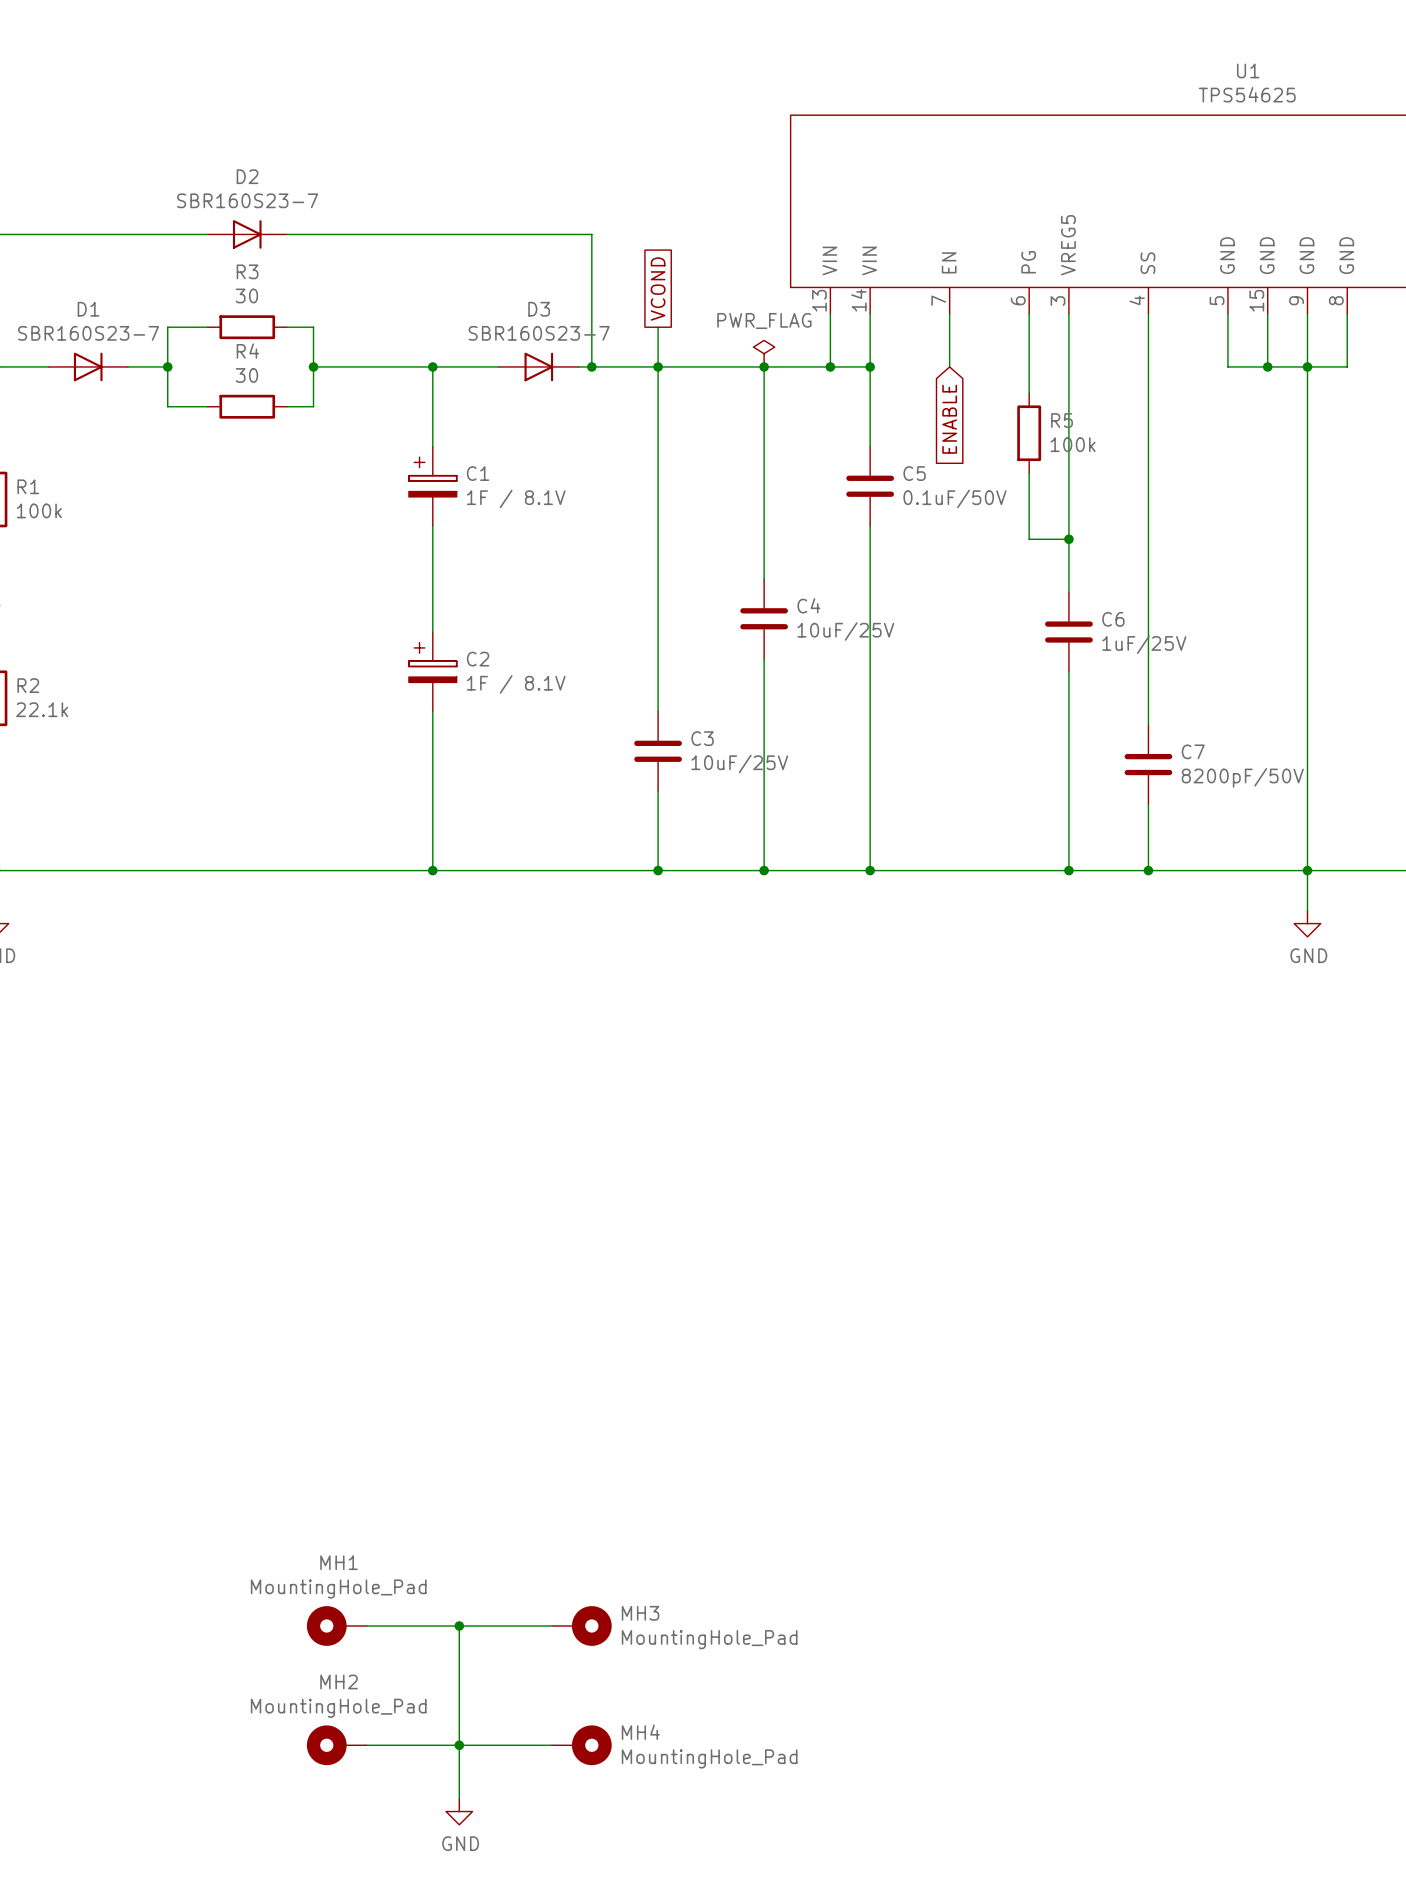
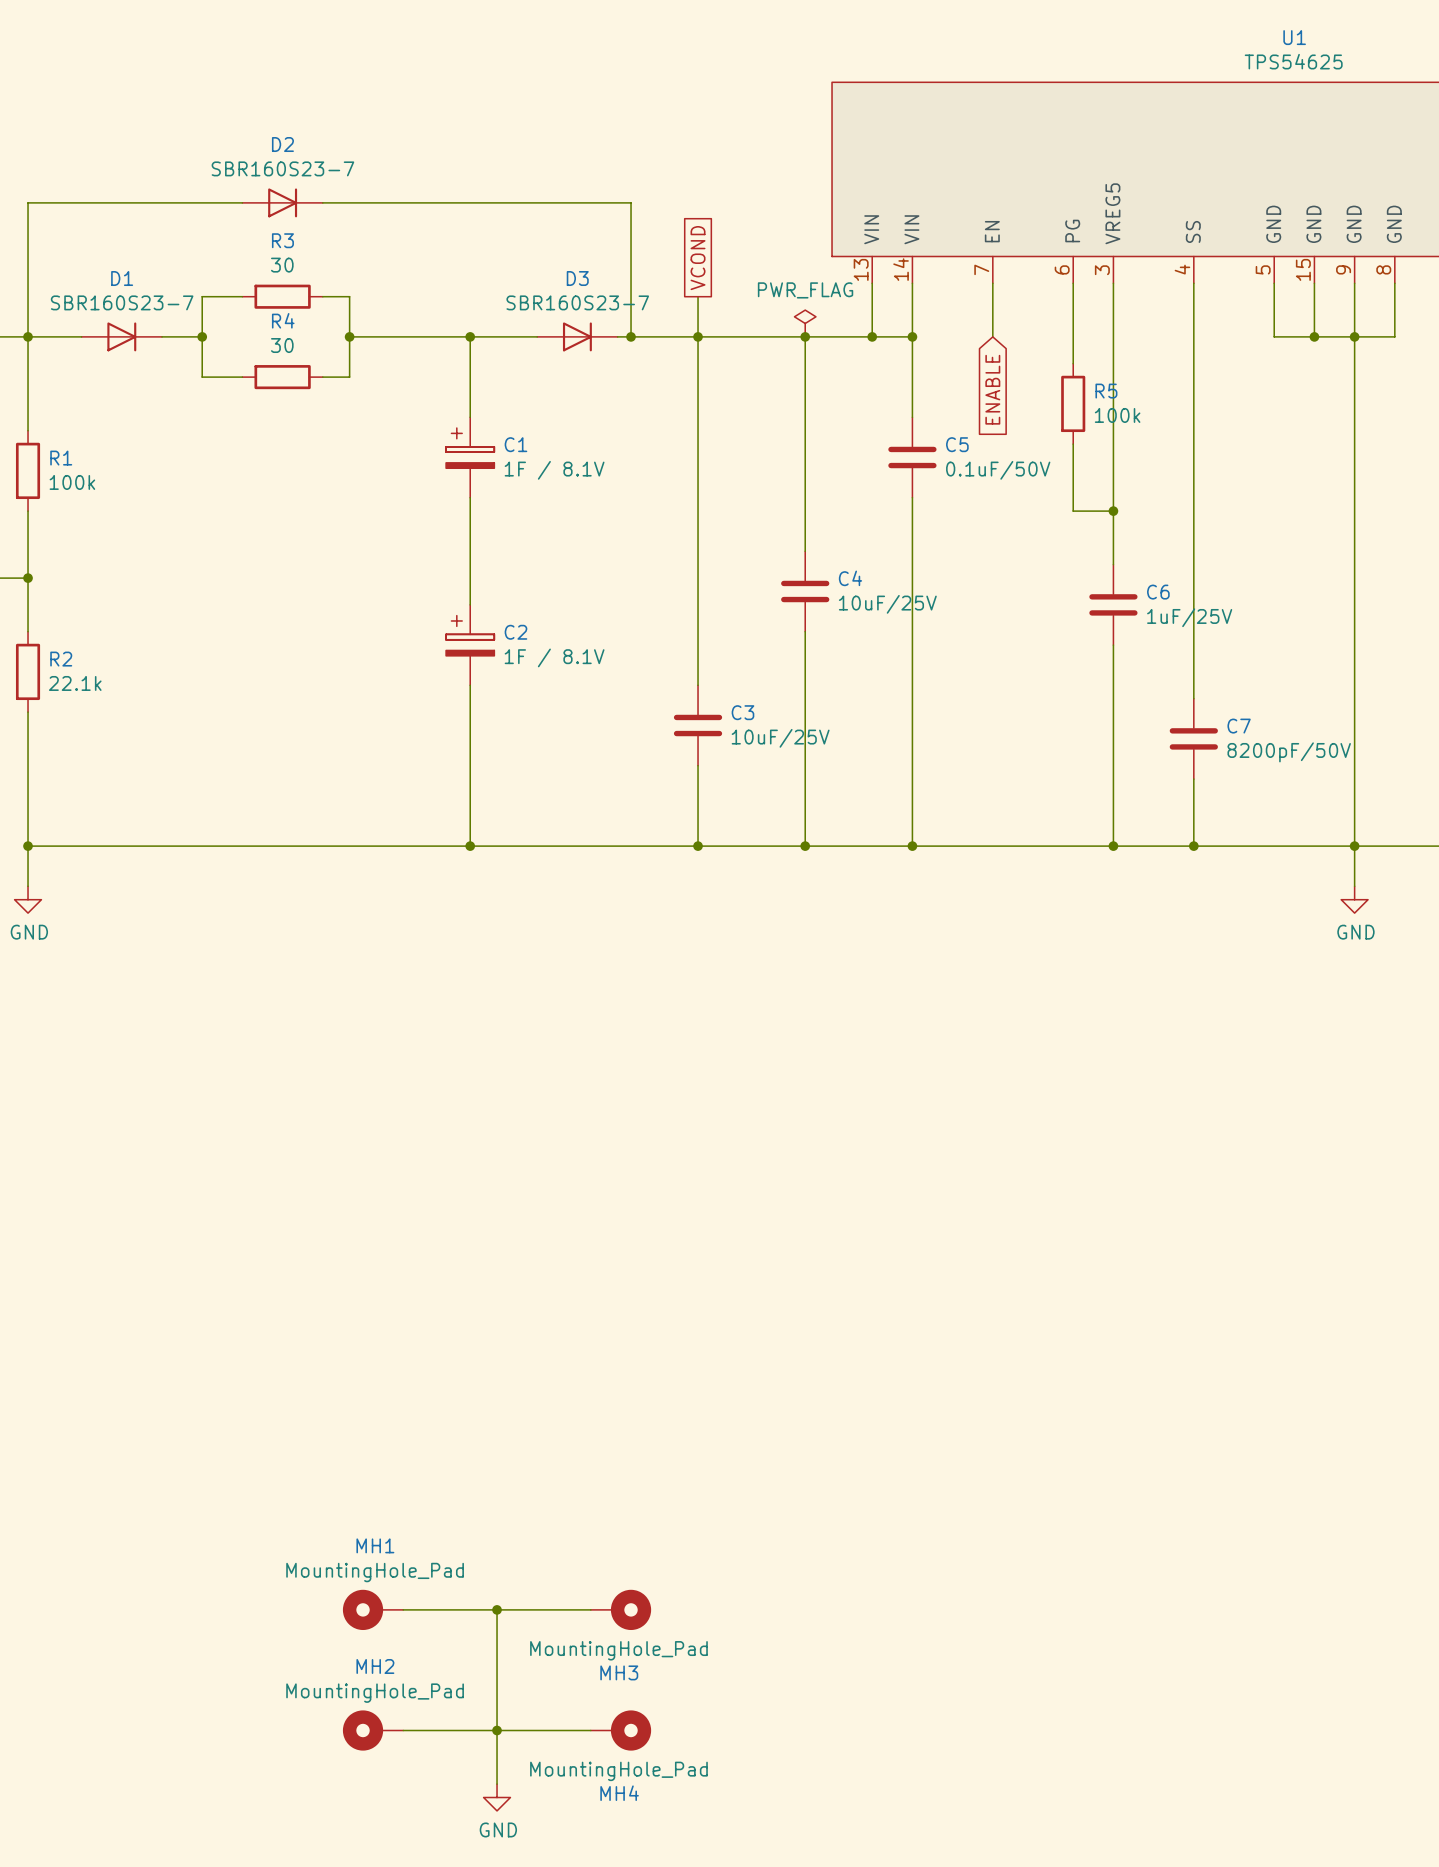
MH3 name position: MH3 (640, 1613) -> MH3 (619, 1672)
MH3 value position: MountingHole_Pad (709, 1639) -> MountingHole_Pad (618, 1650)
MH4 name position: MH4 (640, 1732) -> MH4 (619, 1793)
MH4 value position: MountingHole_Pad (709, 1758) -> MountingHole_Pad (618, 1771)

